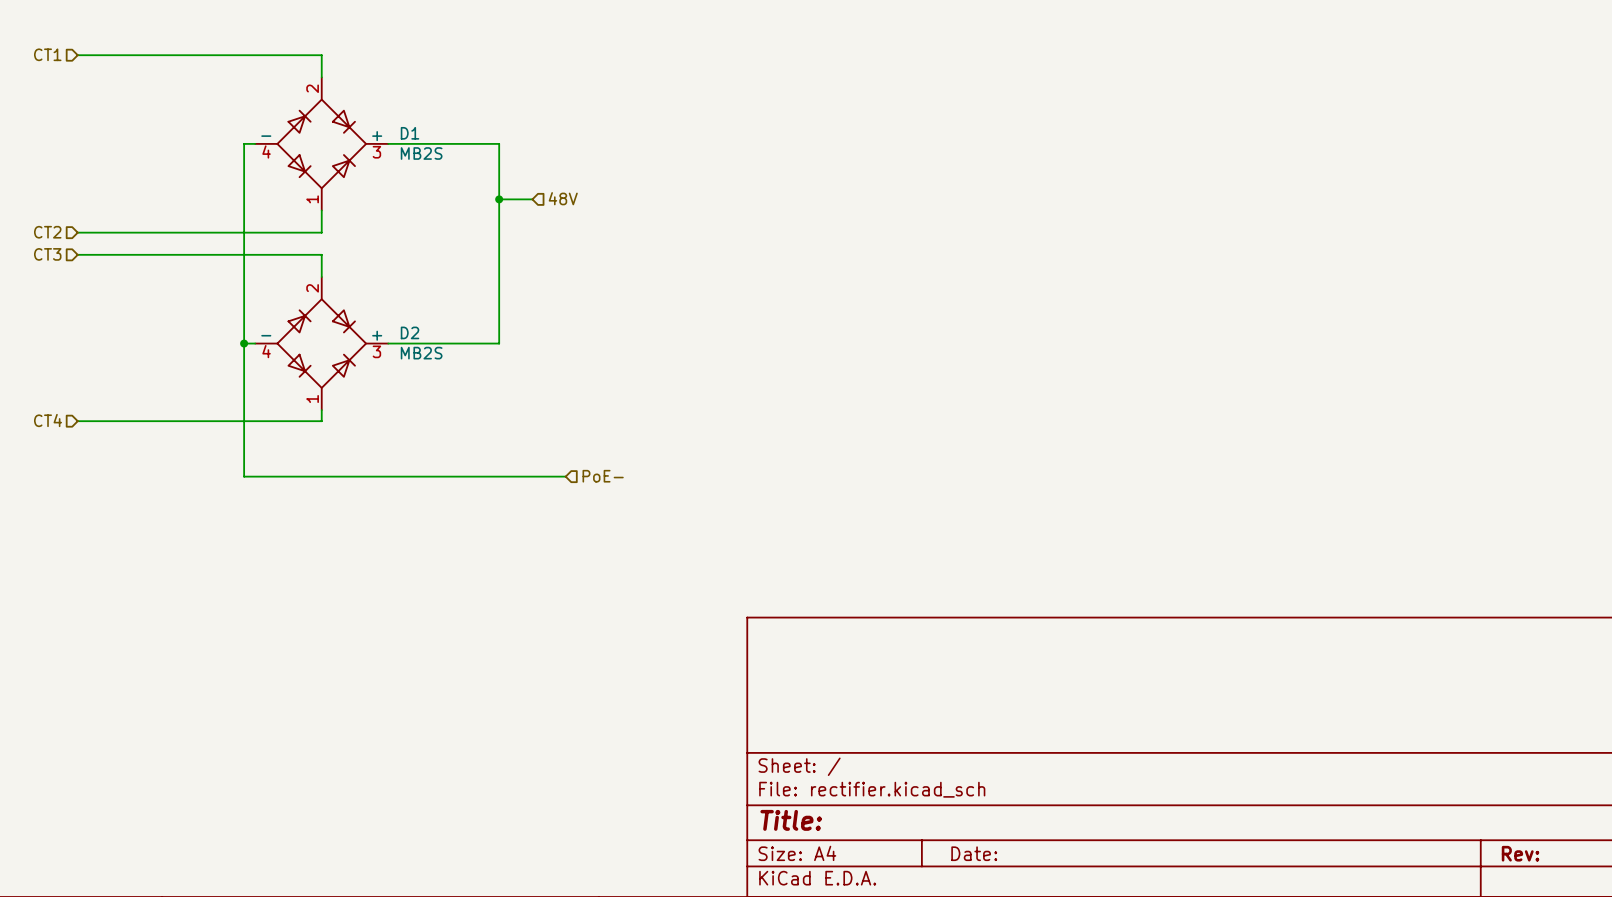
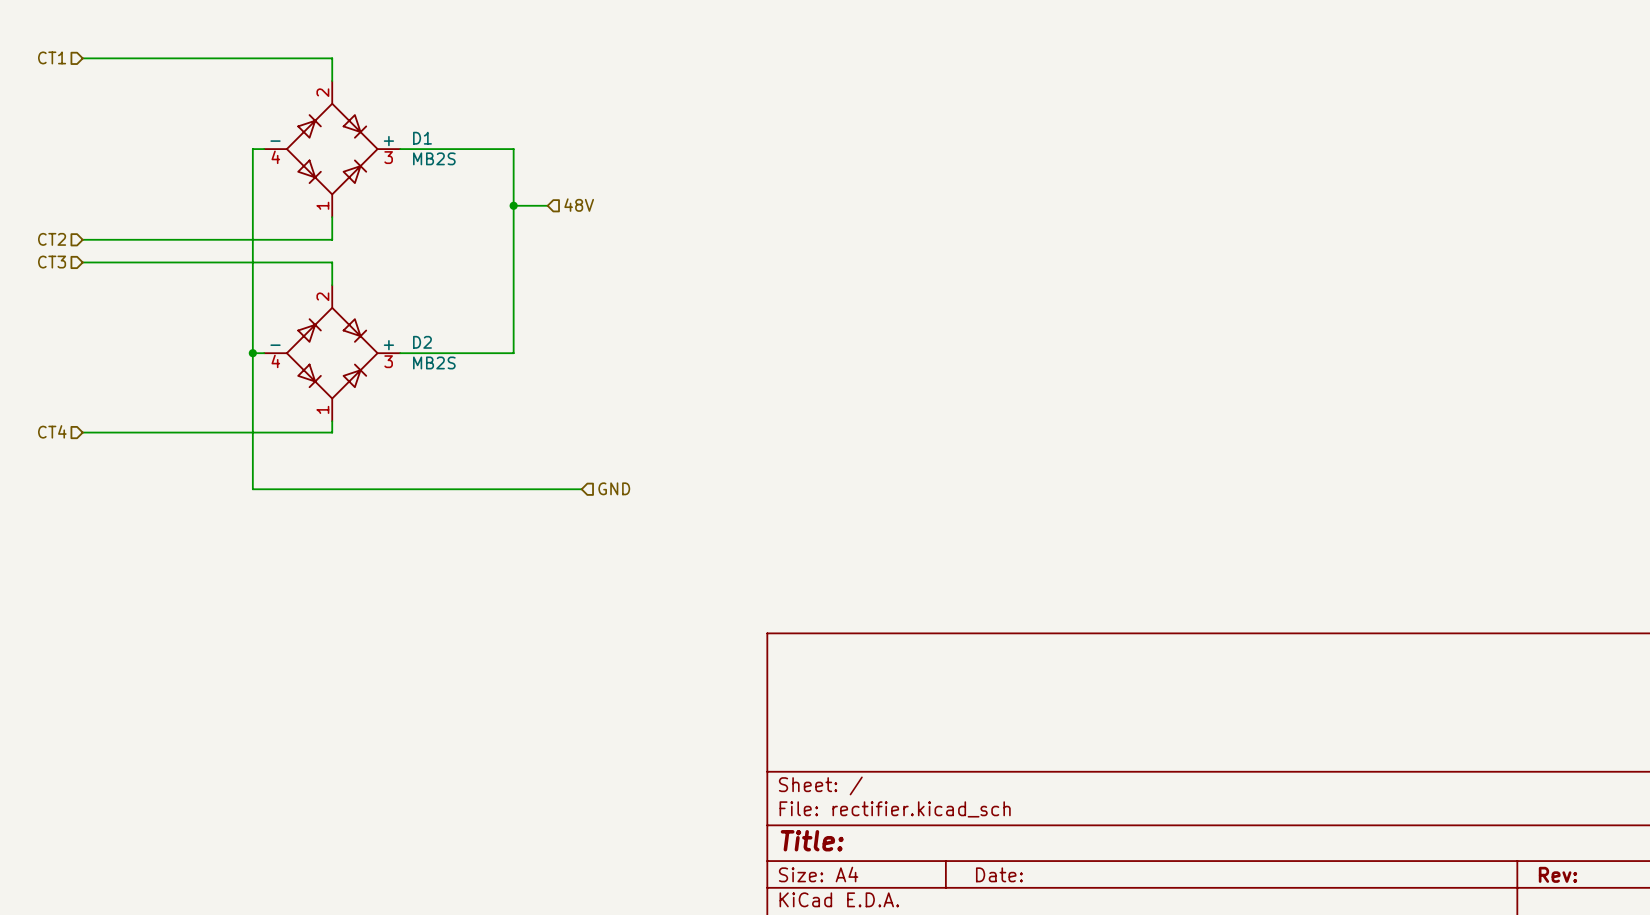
hierarchical label: PoE- (603, 476) -> GND (614, 488)

